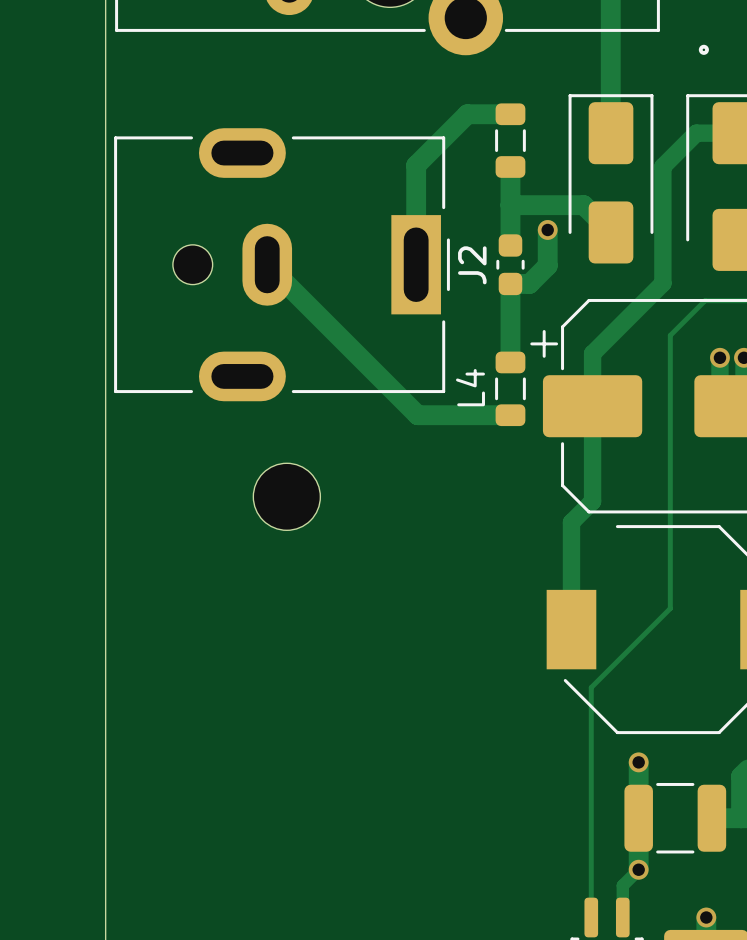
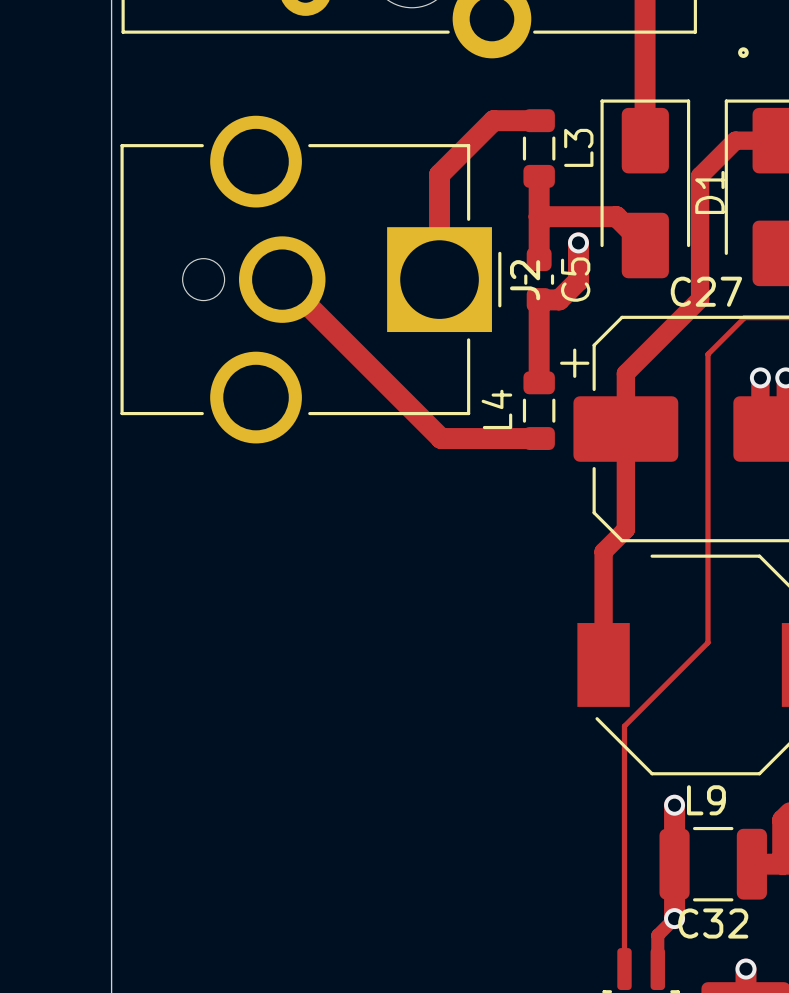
J2 footprint: [114, 128, 450, 402] -> [120, 115, 502, 444]
L3 name: none -> L3 (578, 147)
D1 name: none -> D1 (709, 192)
C5 name: none -> C5 (575, 279)
C27 name: none -> C27 (706, 291)
part: (286, 496) -> none
L9 name: none -> L9 (706, 800)
C32 name: none -> C32 (713, 923)

